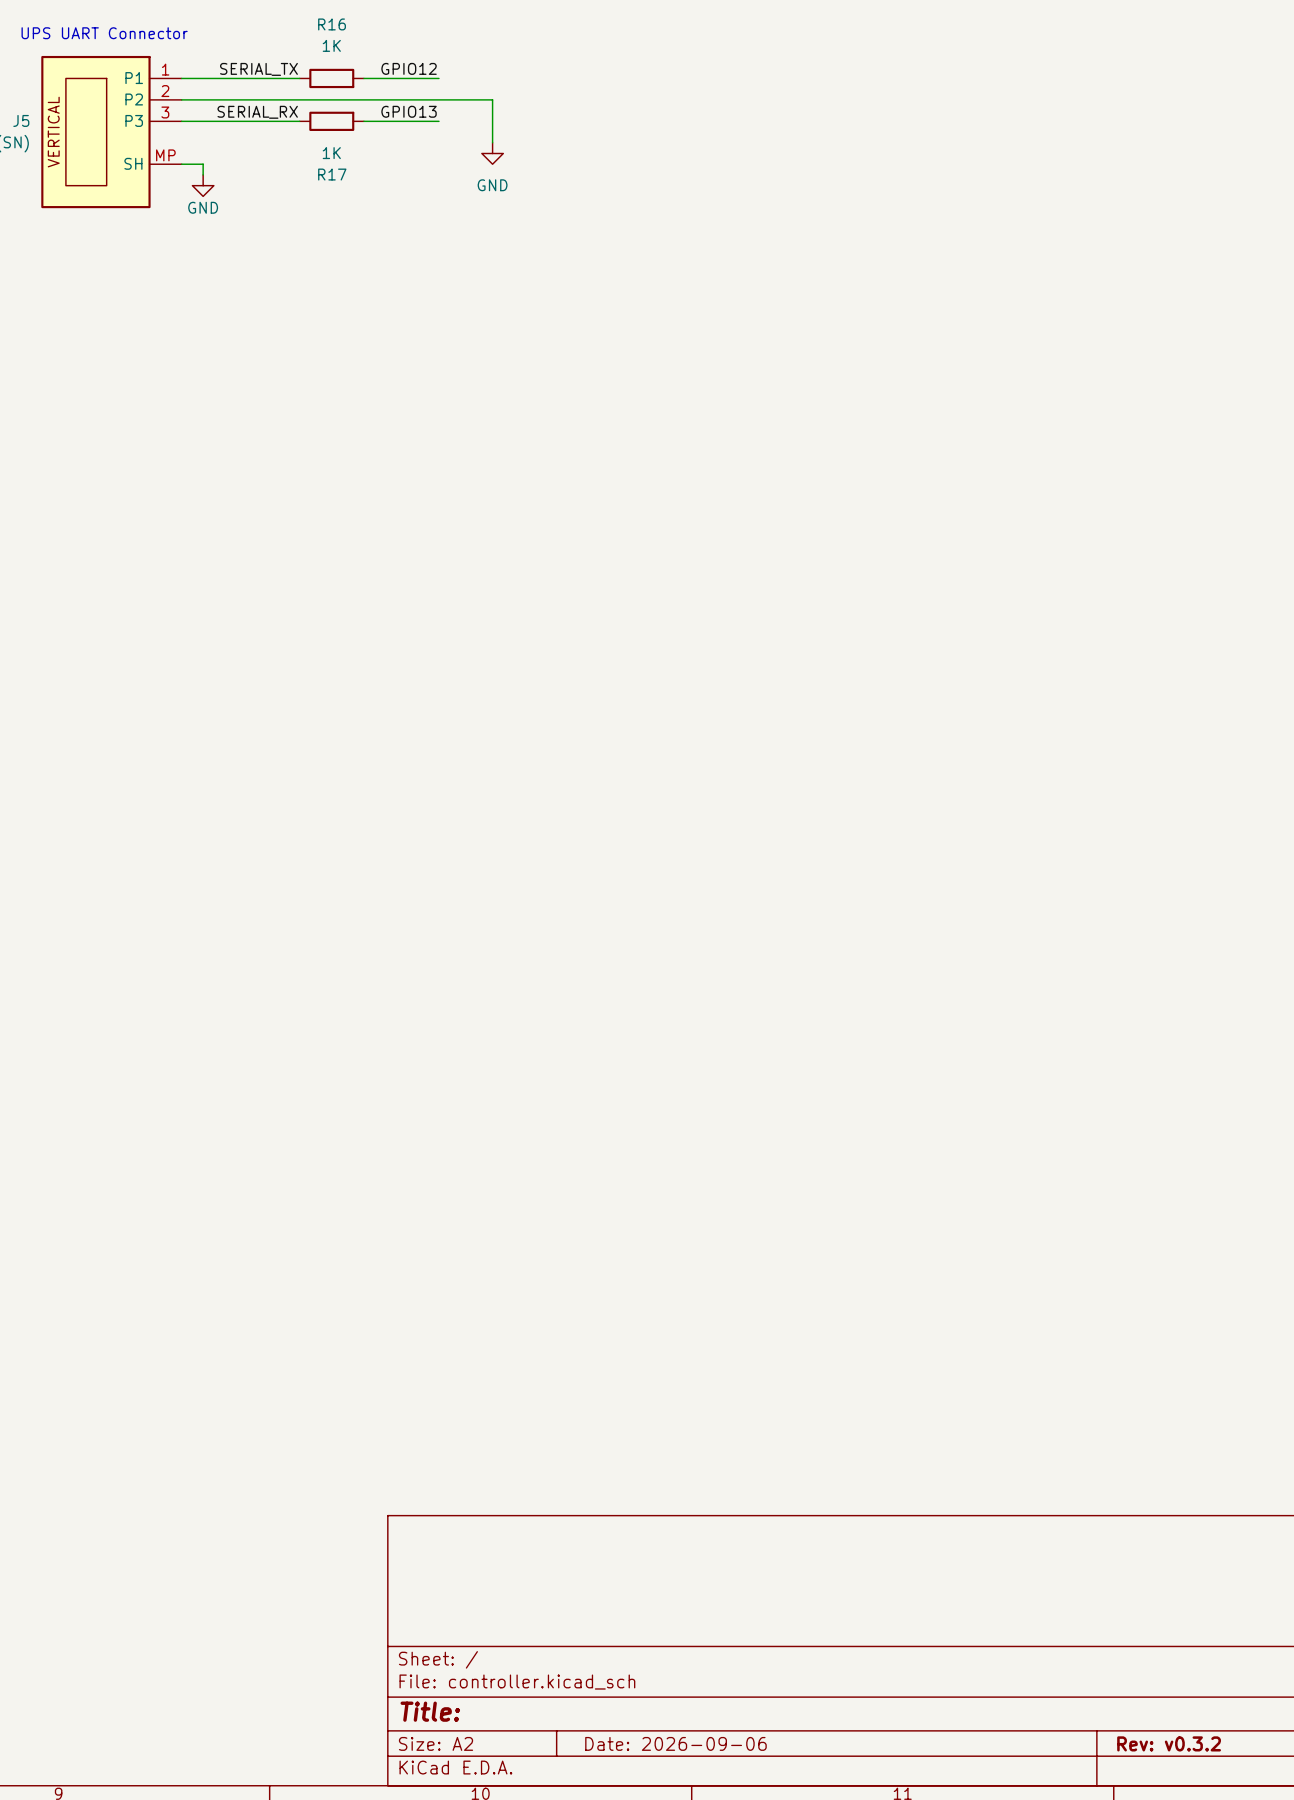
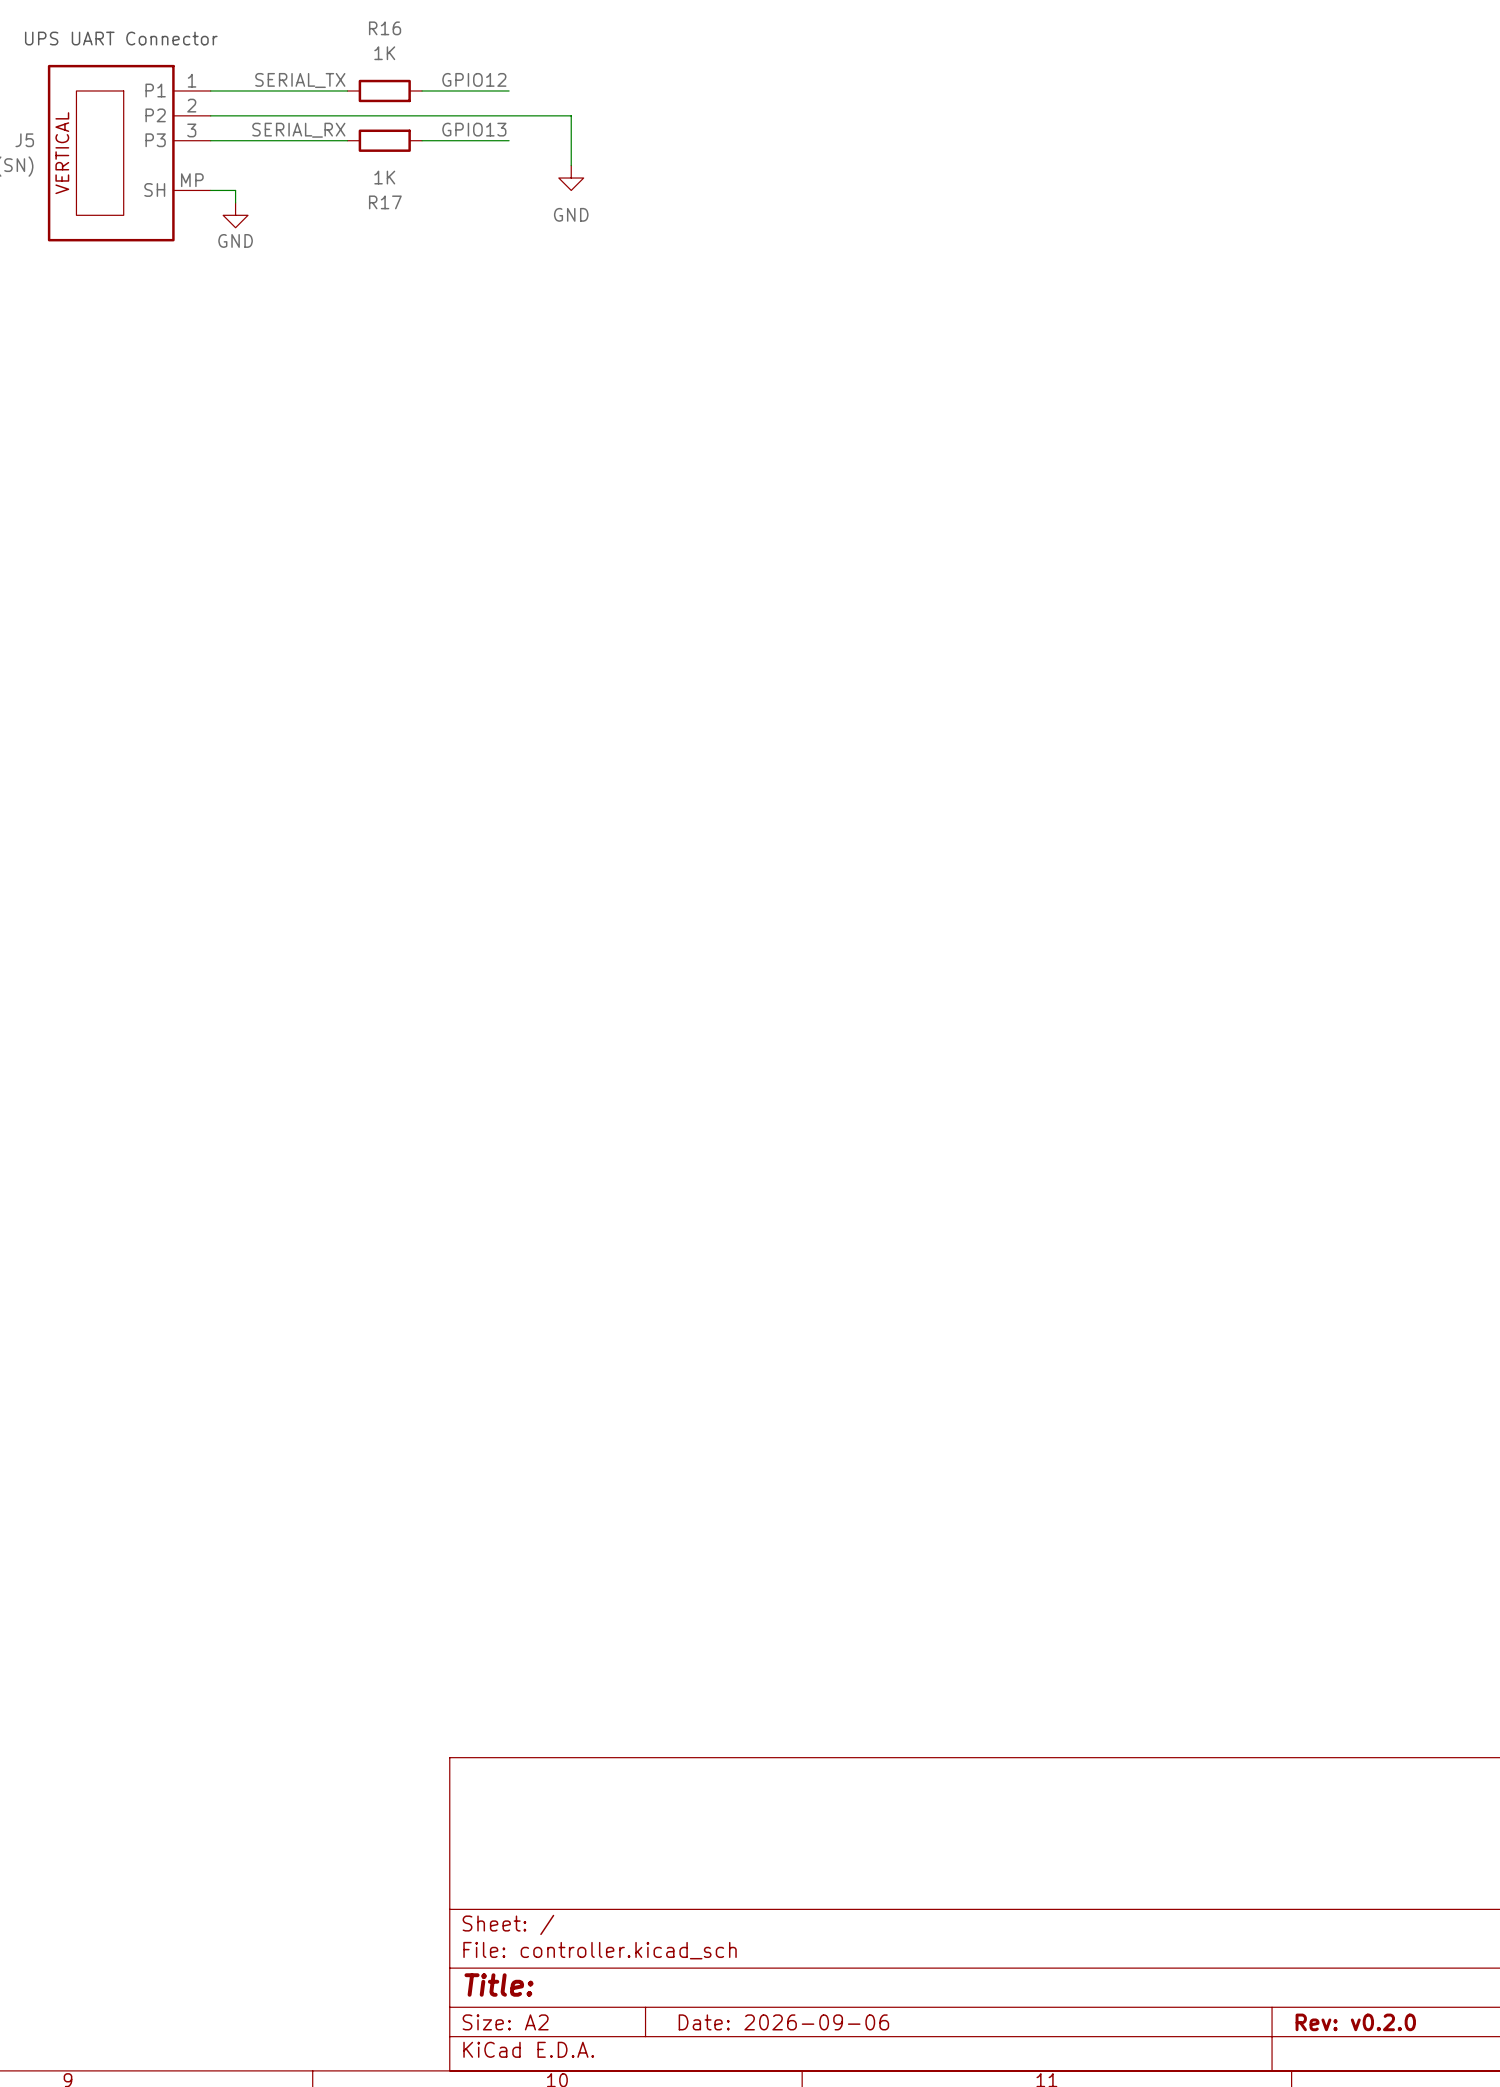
title block: Rev: v0.3.2 (1169, 1743) -> Rev: v0.2.0 (1355, 2022)

